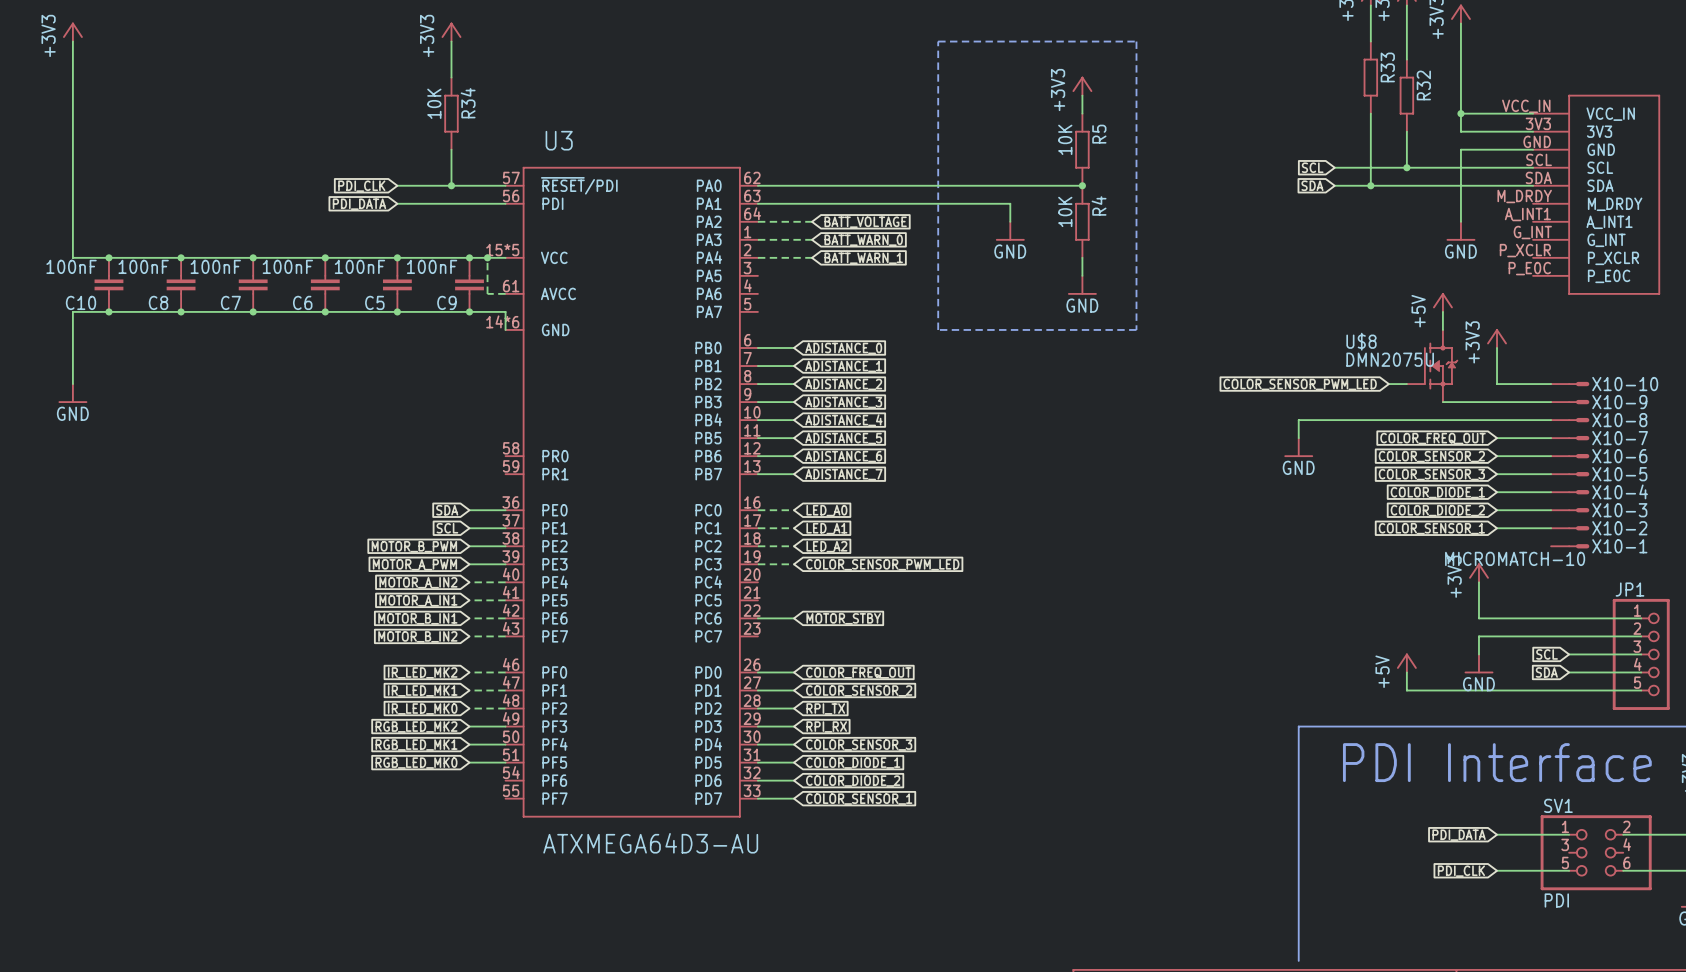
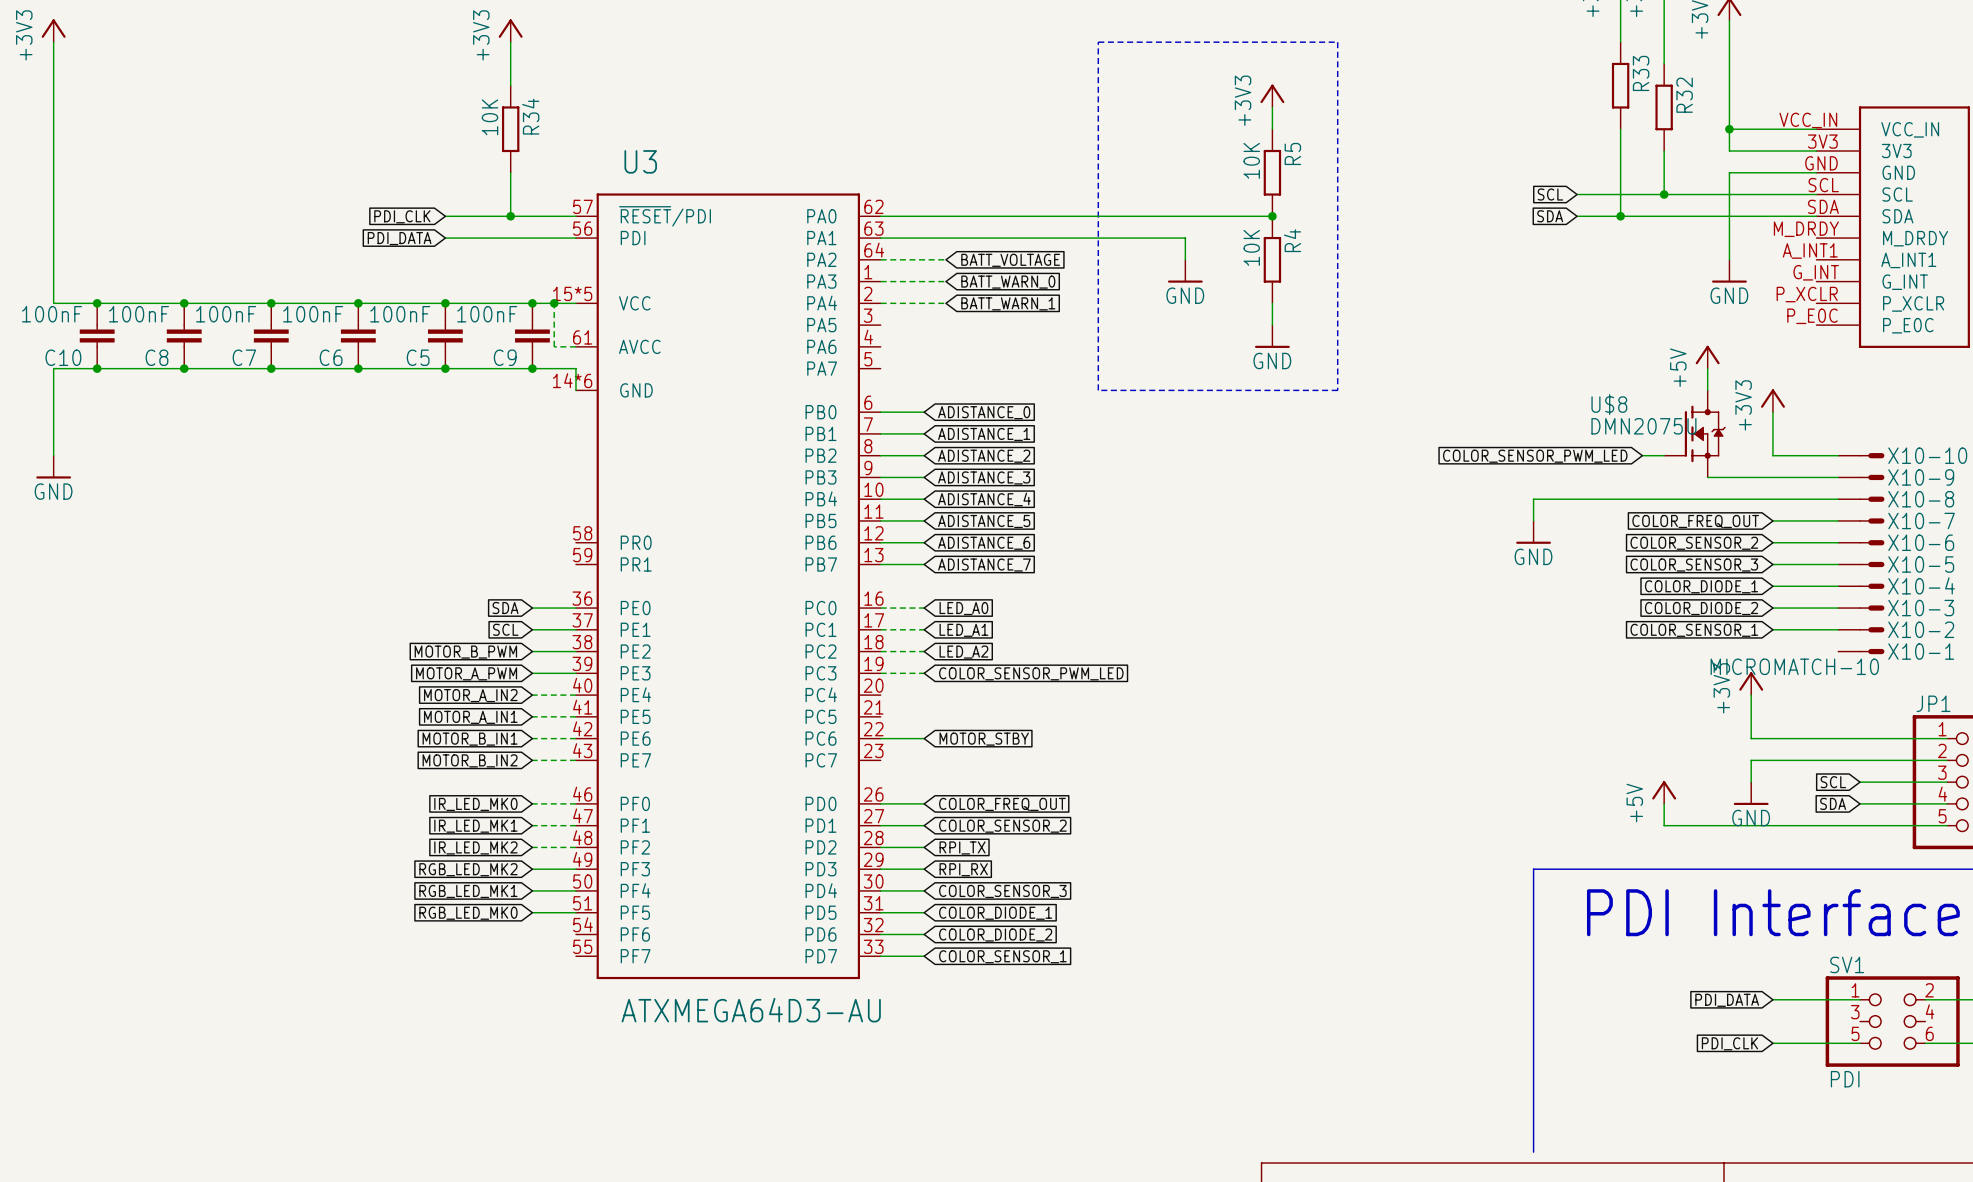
global label: IR_LED_MK2 (422, 672) -> IR_LED_MK0 (475, 804)
global label: IR_LED_MK0 (422, 708) -> IR_LED_MK2 (475, 847)

